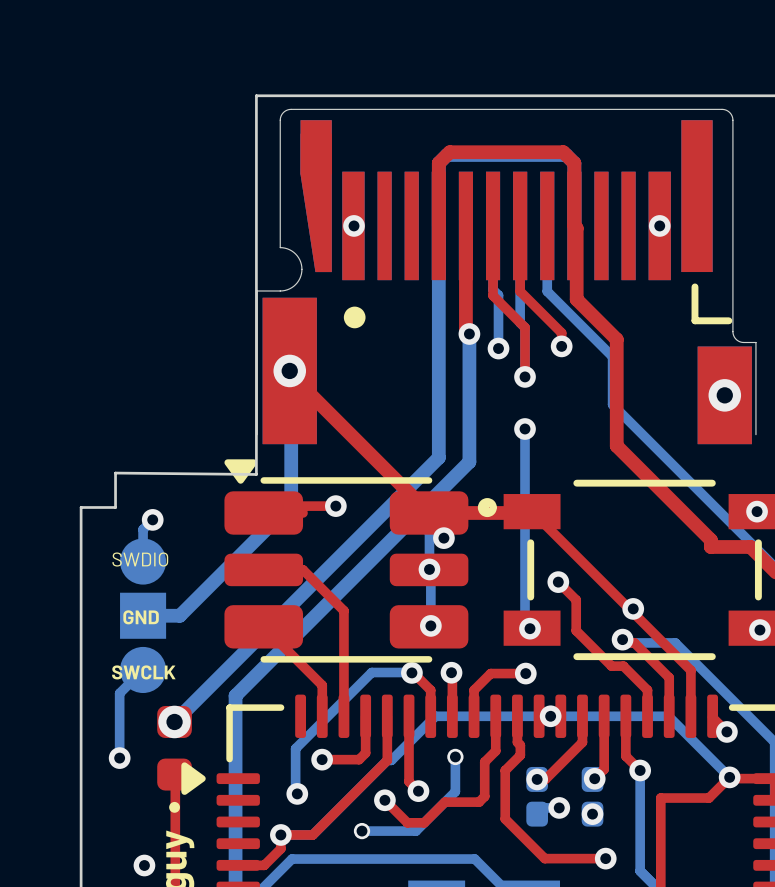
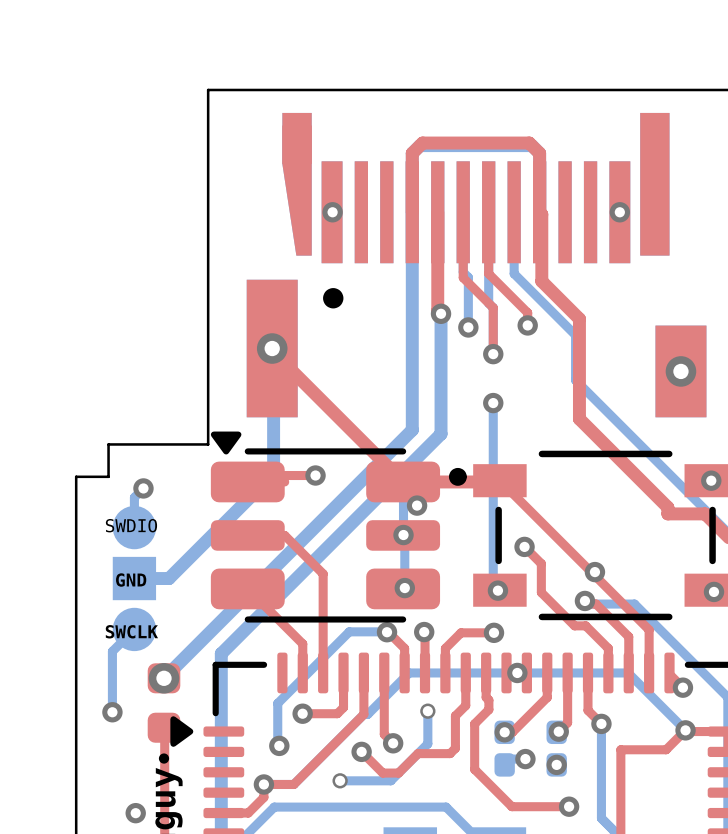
board edge: (256, 95) (256, 474) (115, 473) -> (240, 89) (208, 89) (208, 444) (108, 444)
part footprint: [256, 109, 757, 445] -> [246, 112, 707, 418]

